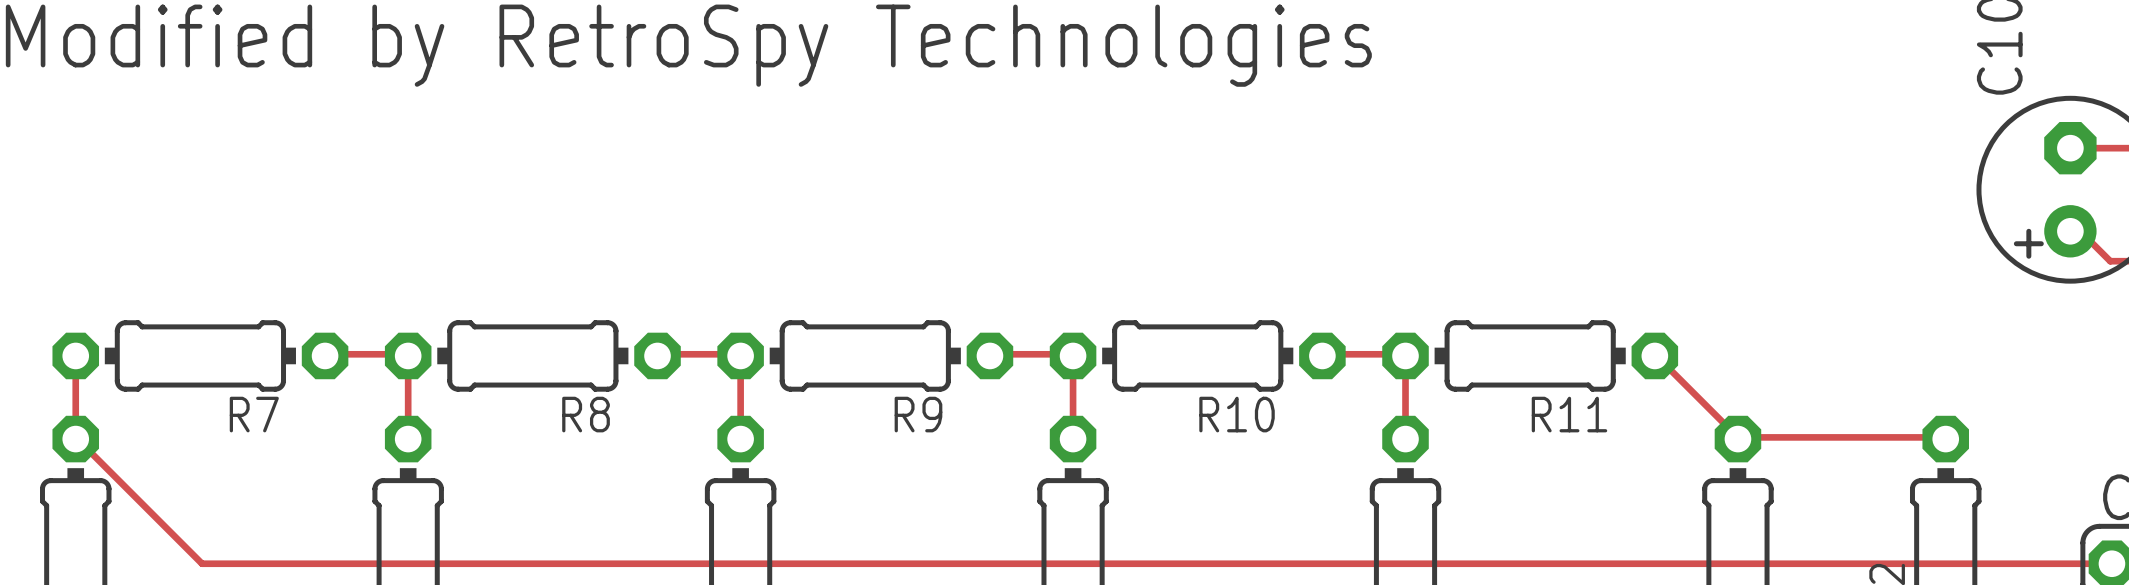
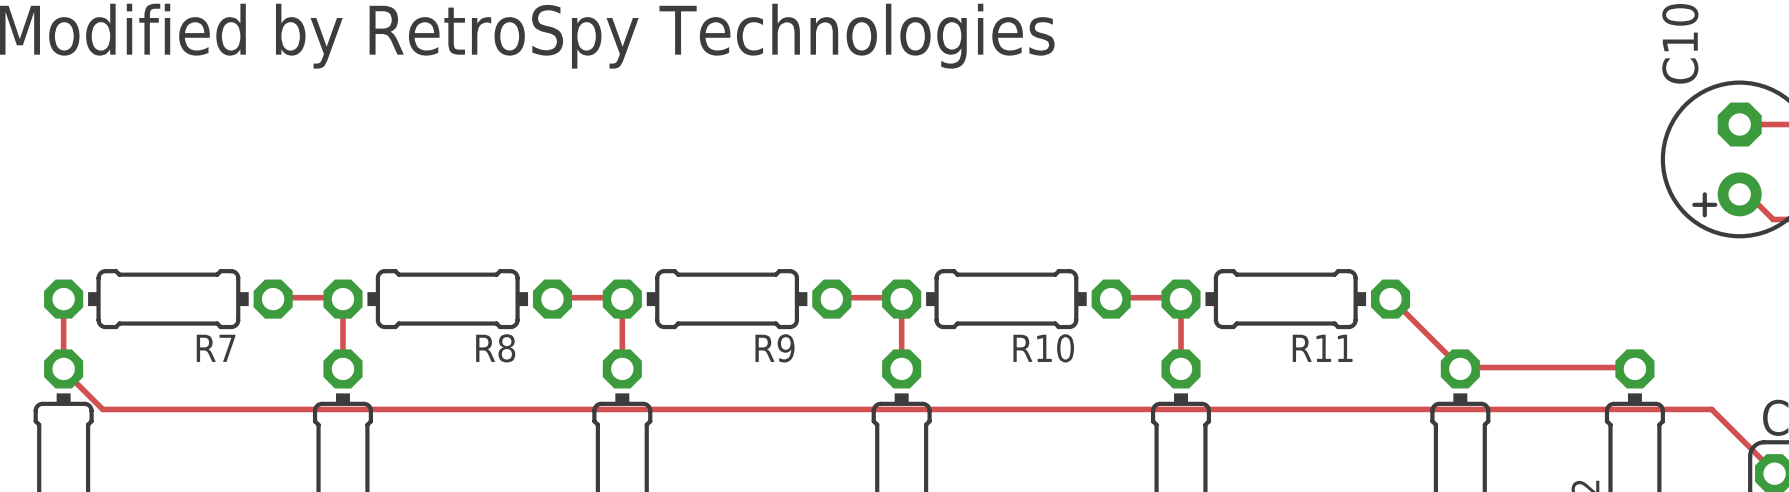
top track: (75, 437) (202, 563) (2111, 563) -> (63, 368) (102, 409) (1711, 409) (1774, 473)

